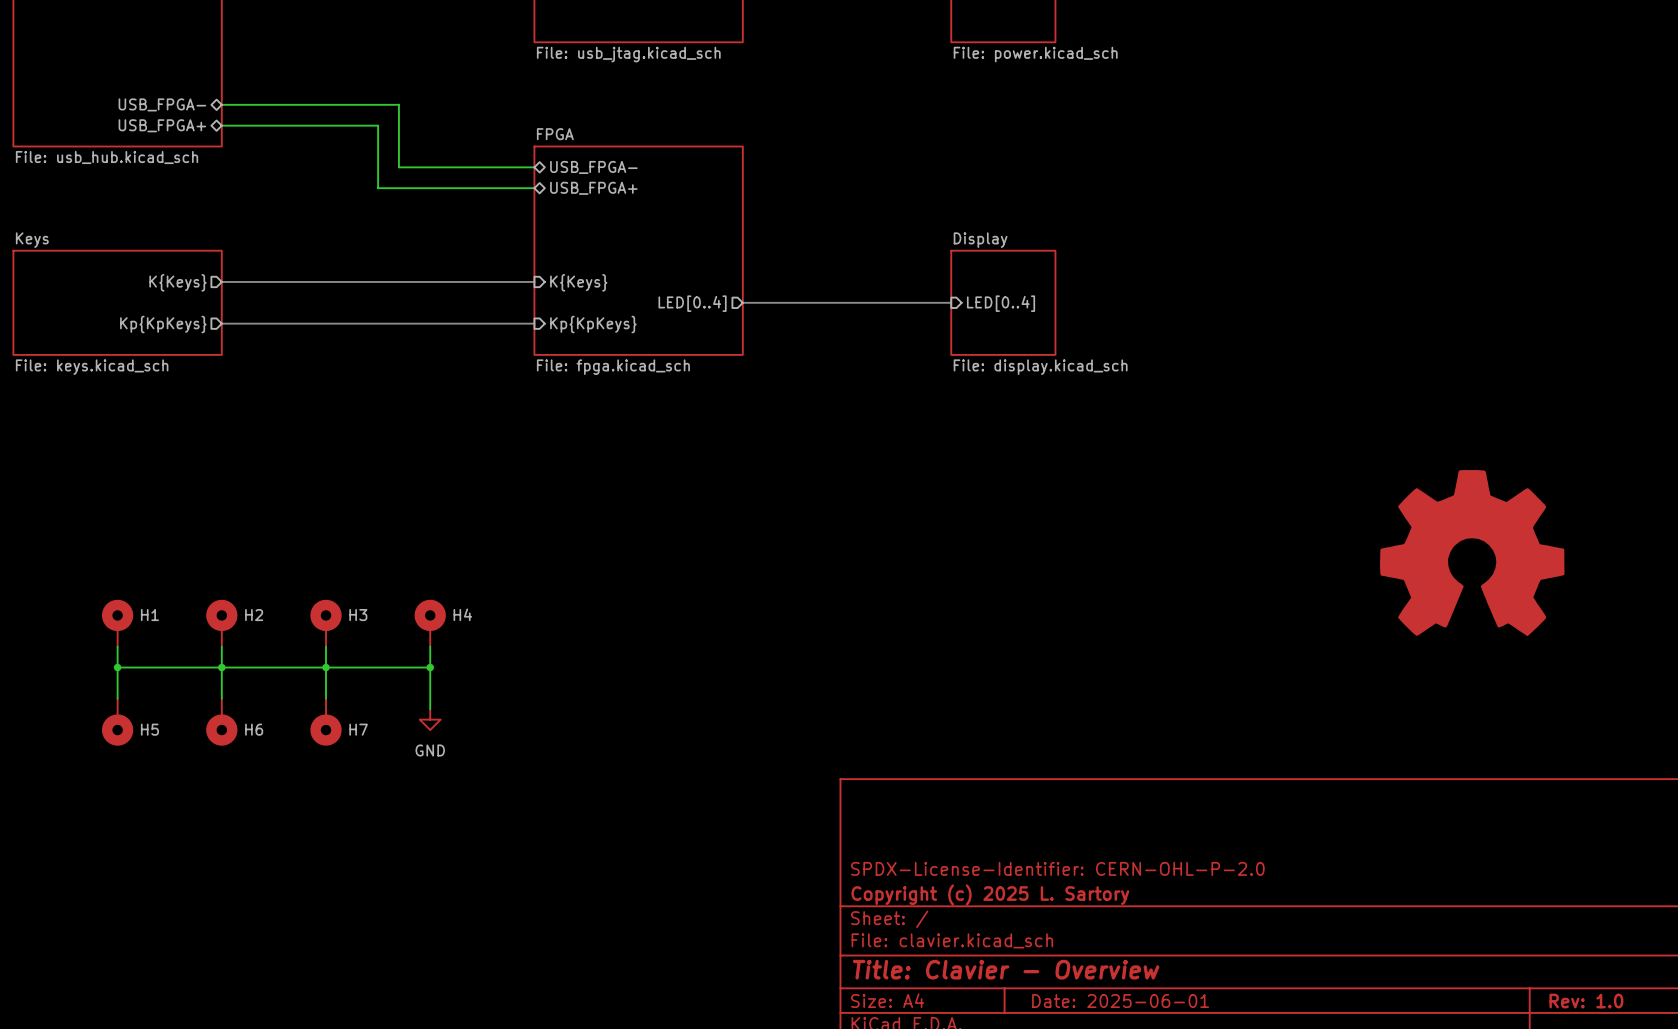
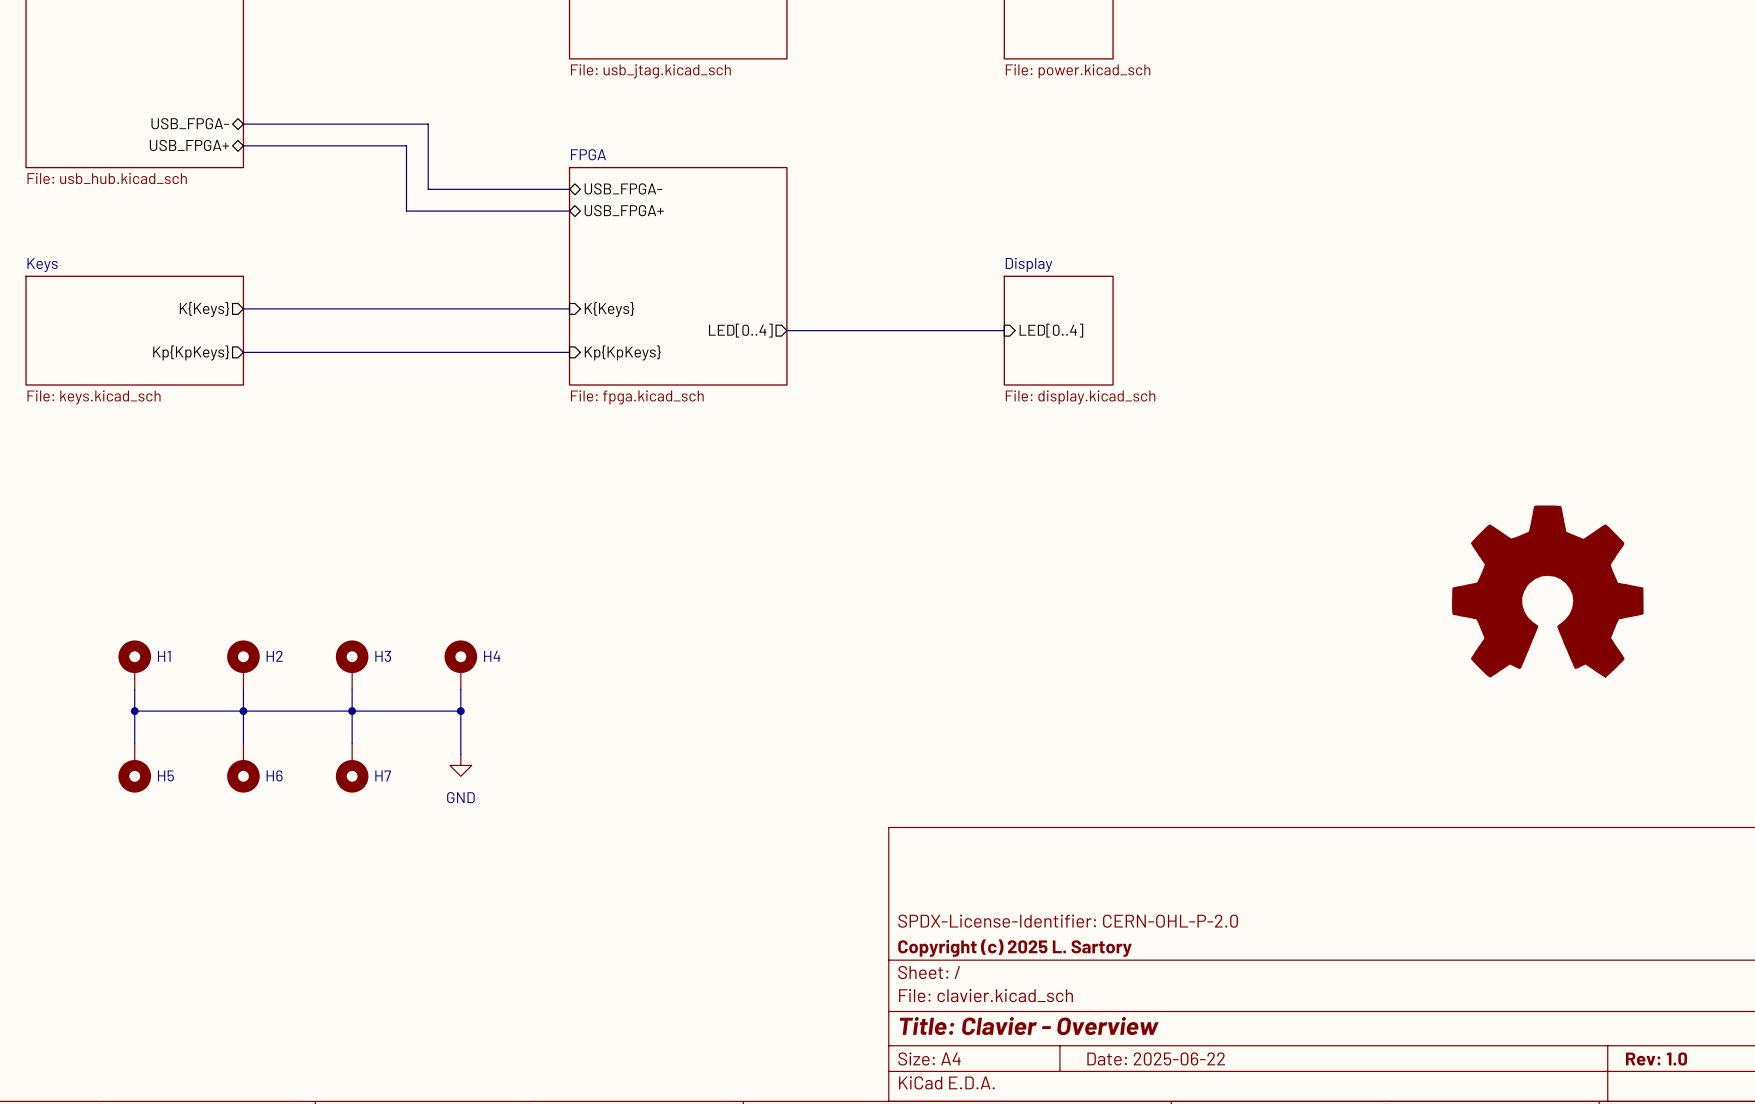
title block: Date: 2025-06-01 (1120, 1001) -> Date: 2025-06-22 (1156, 1058)

